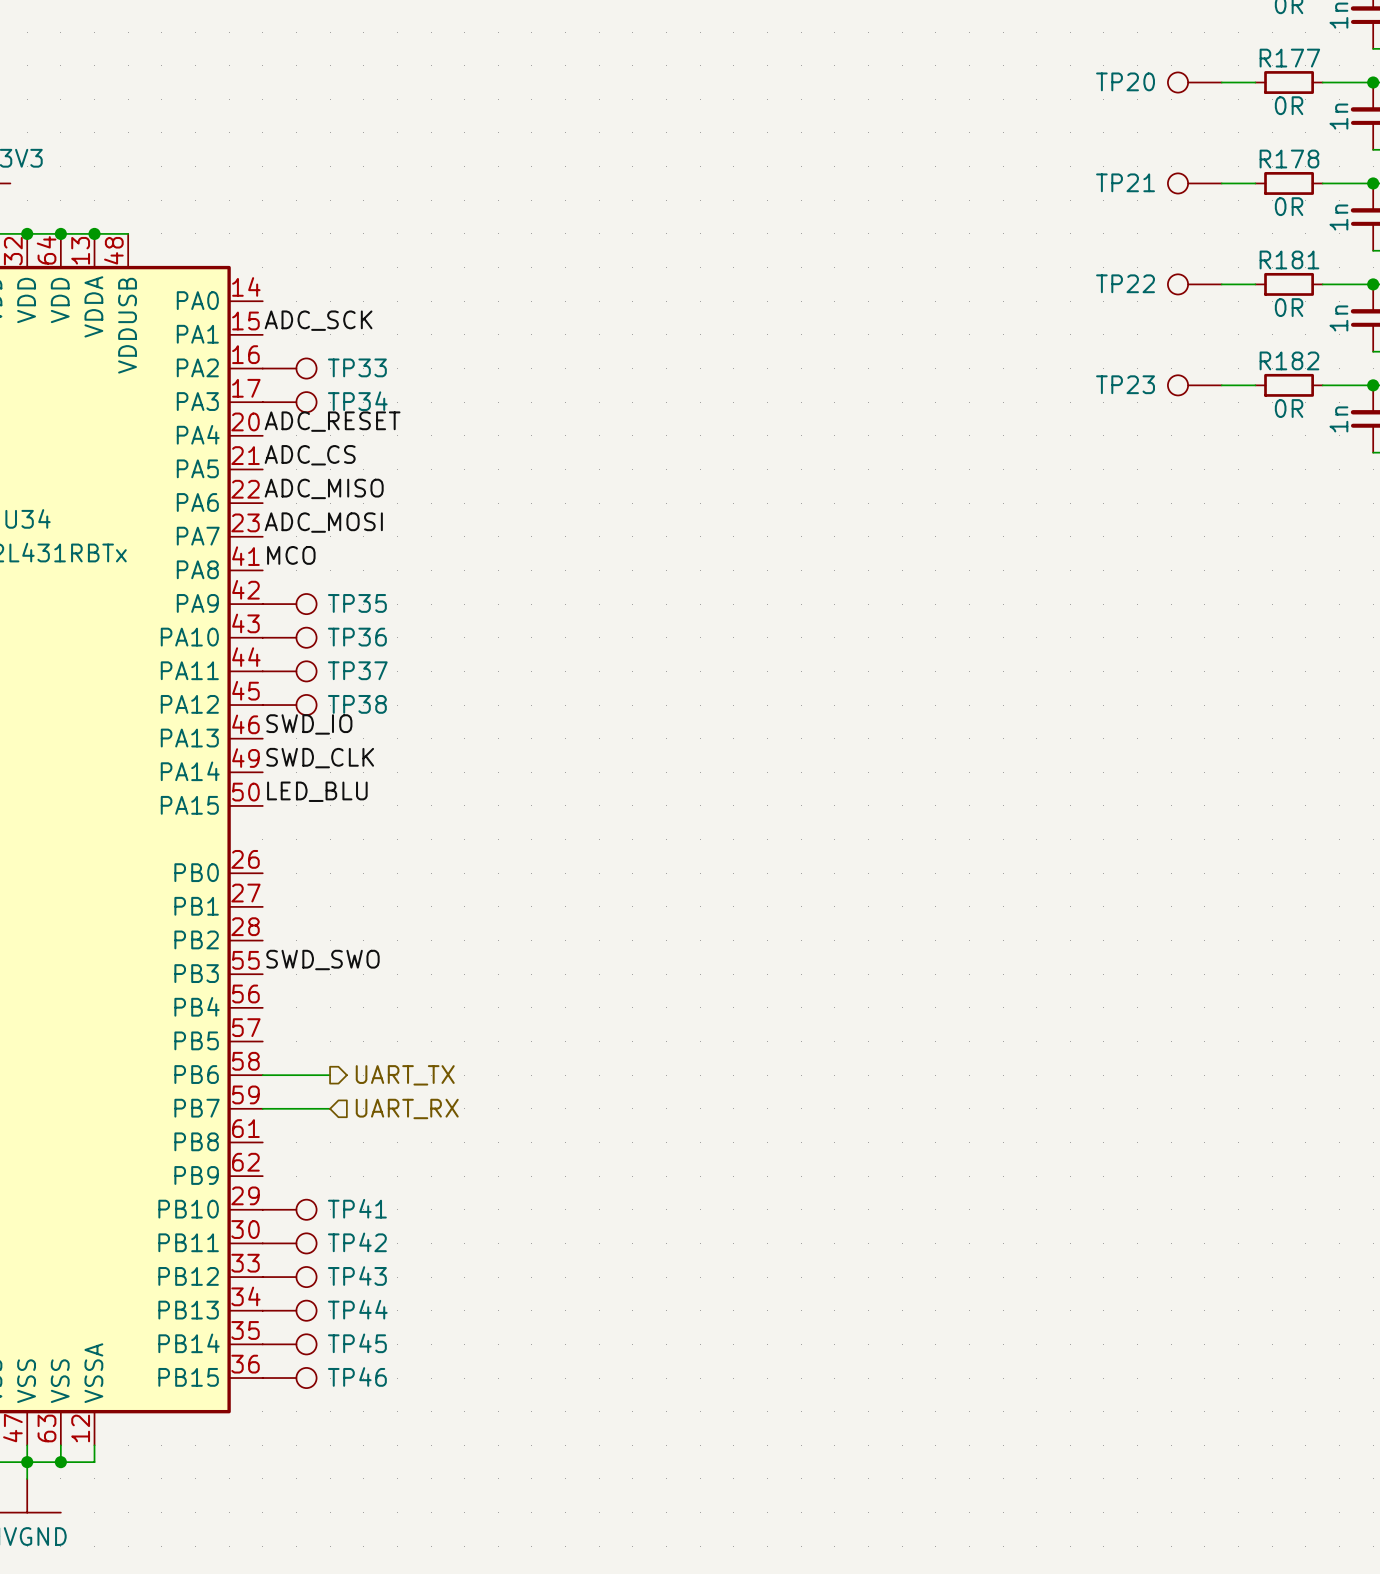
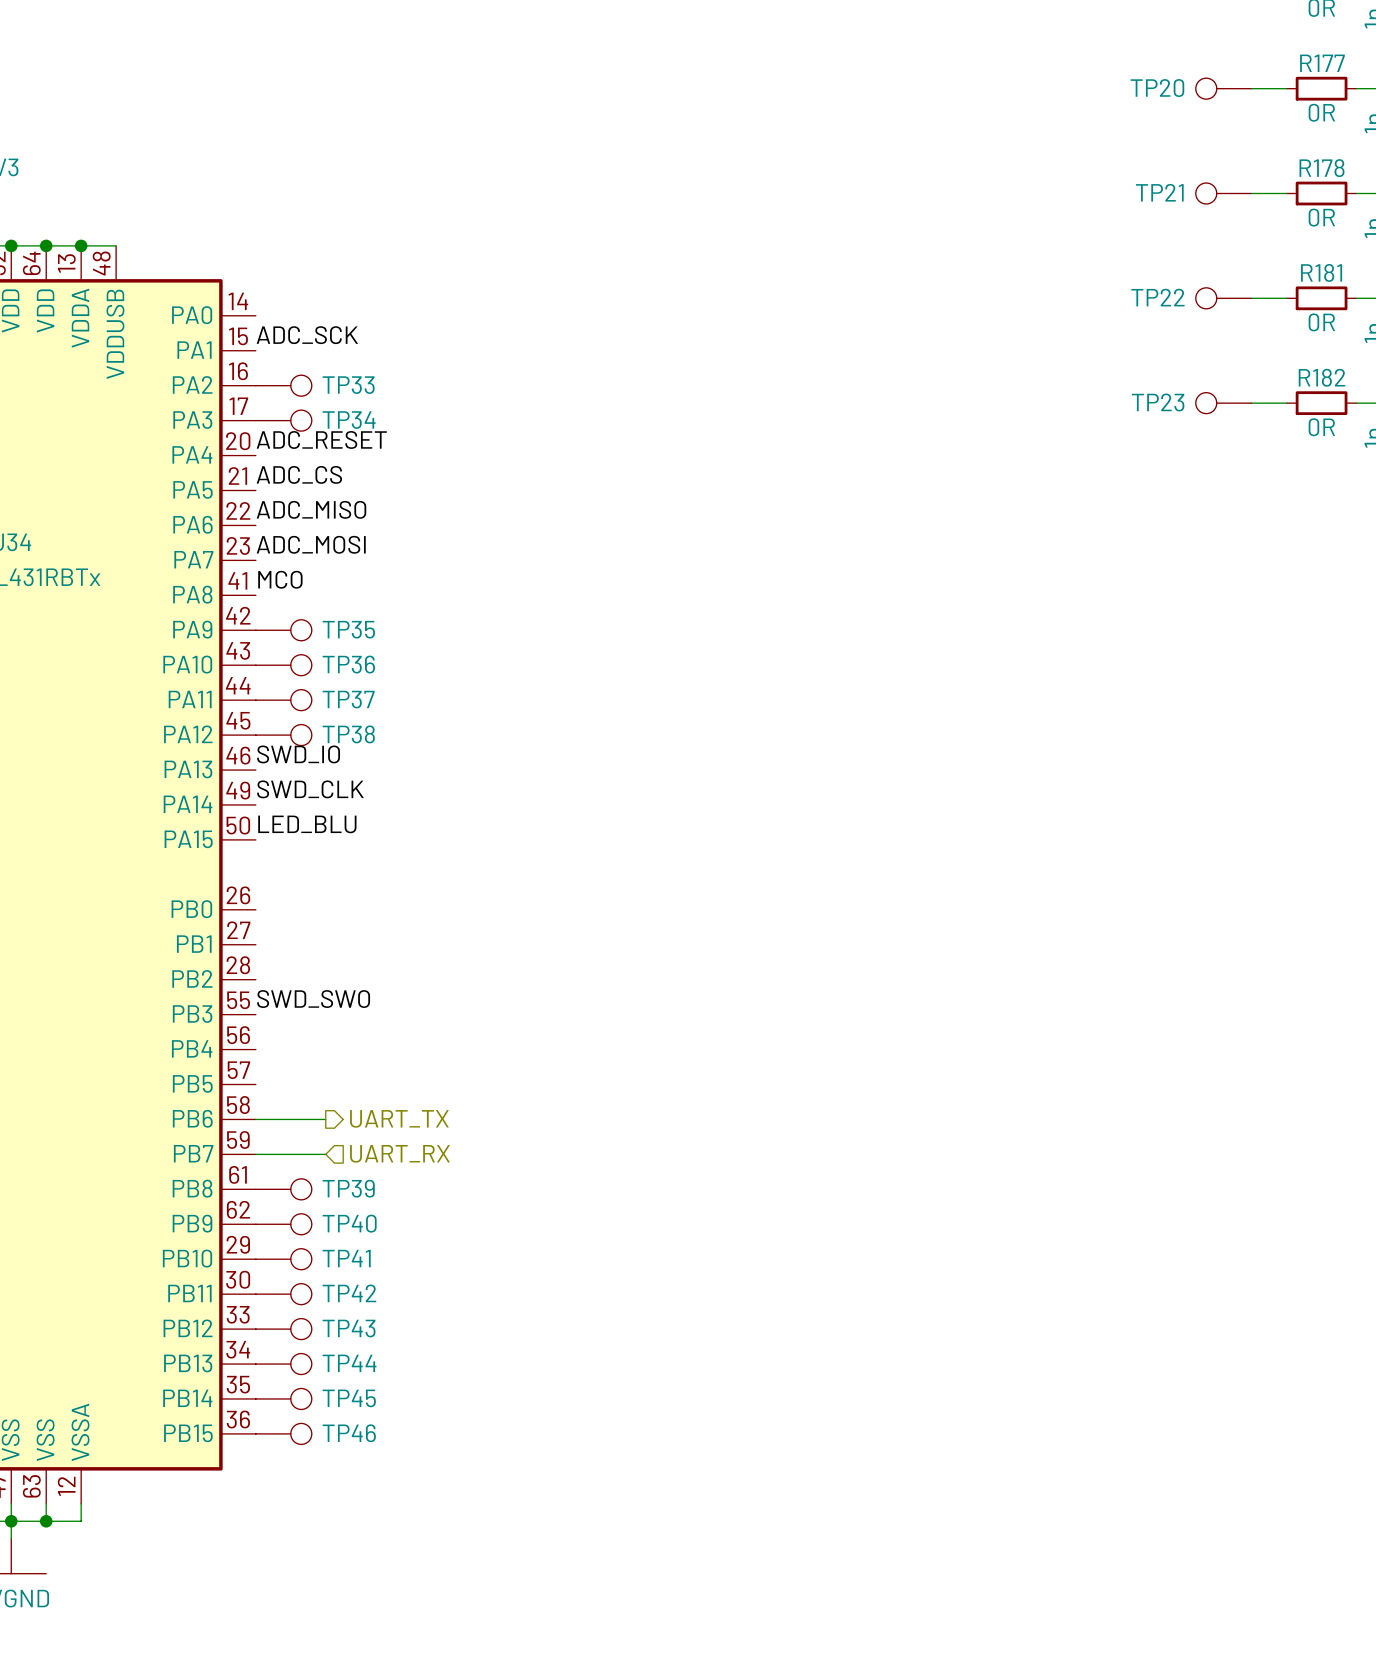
TP39: none -> (283, 1189)
TP40: none -> (283, 1224)

